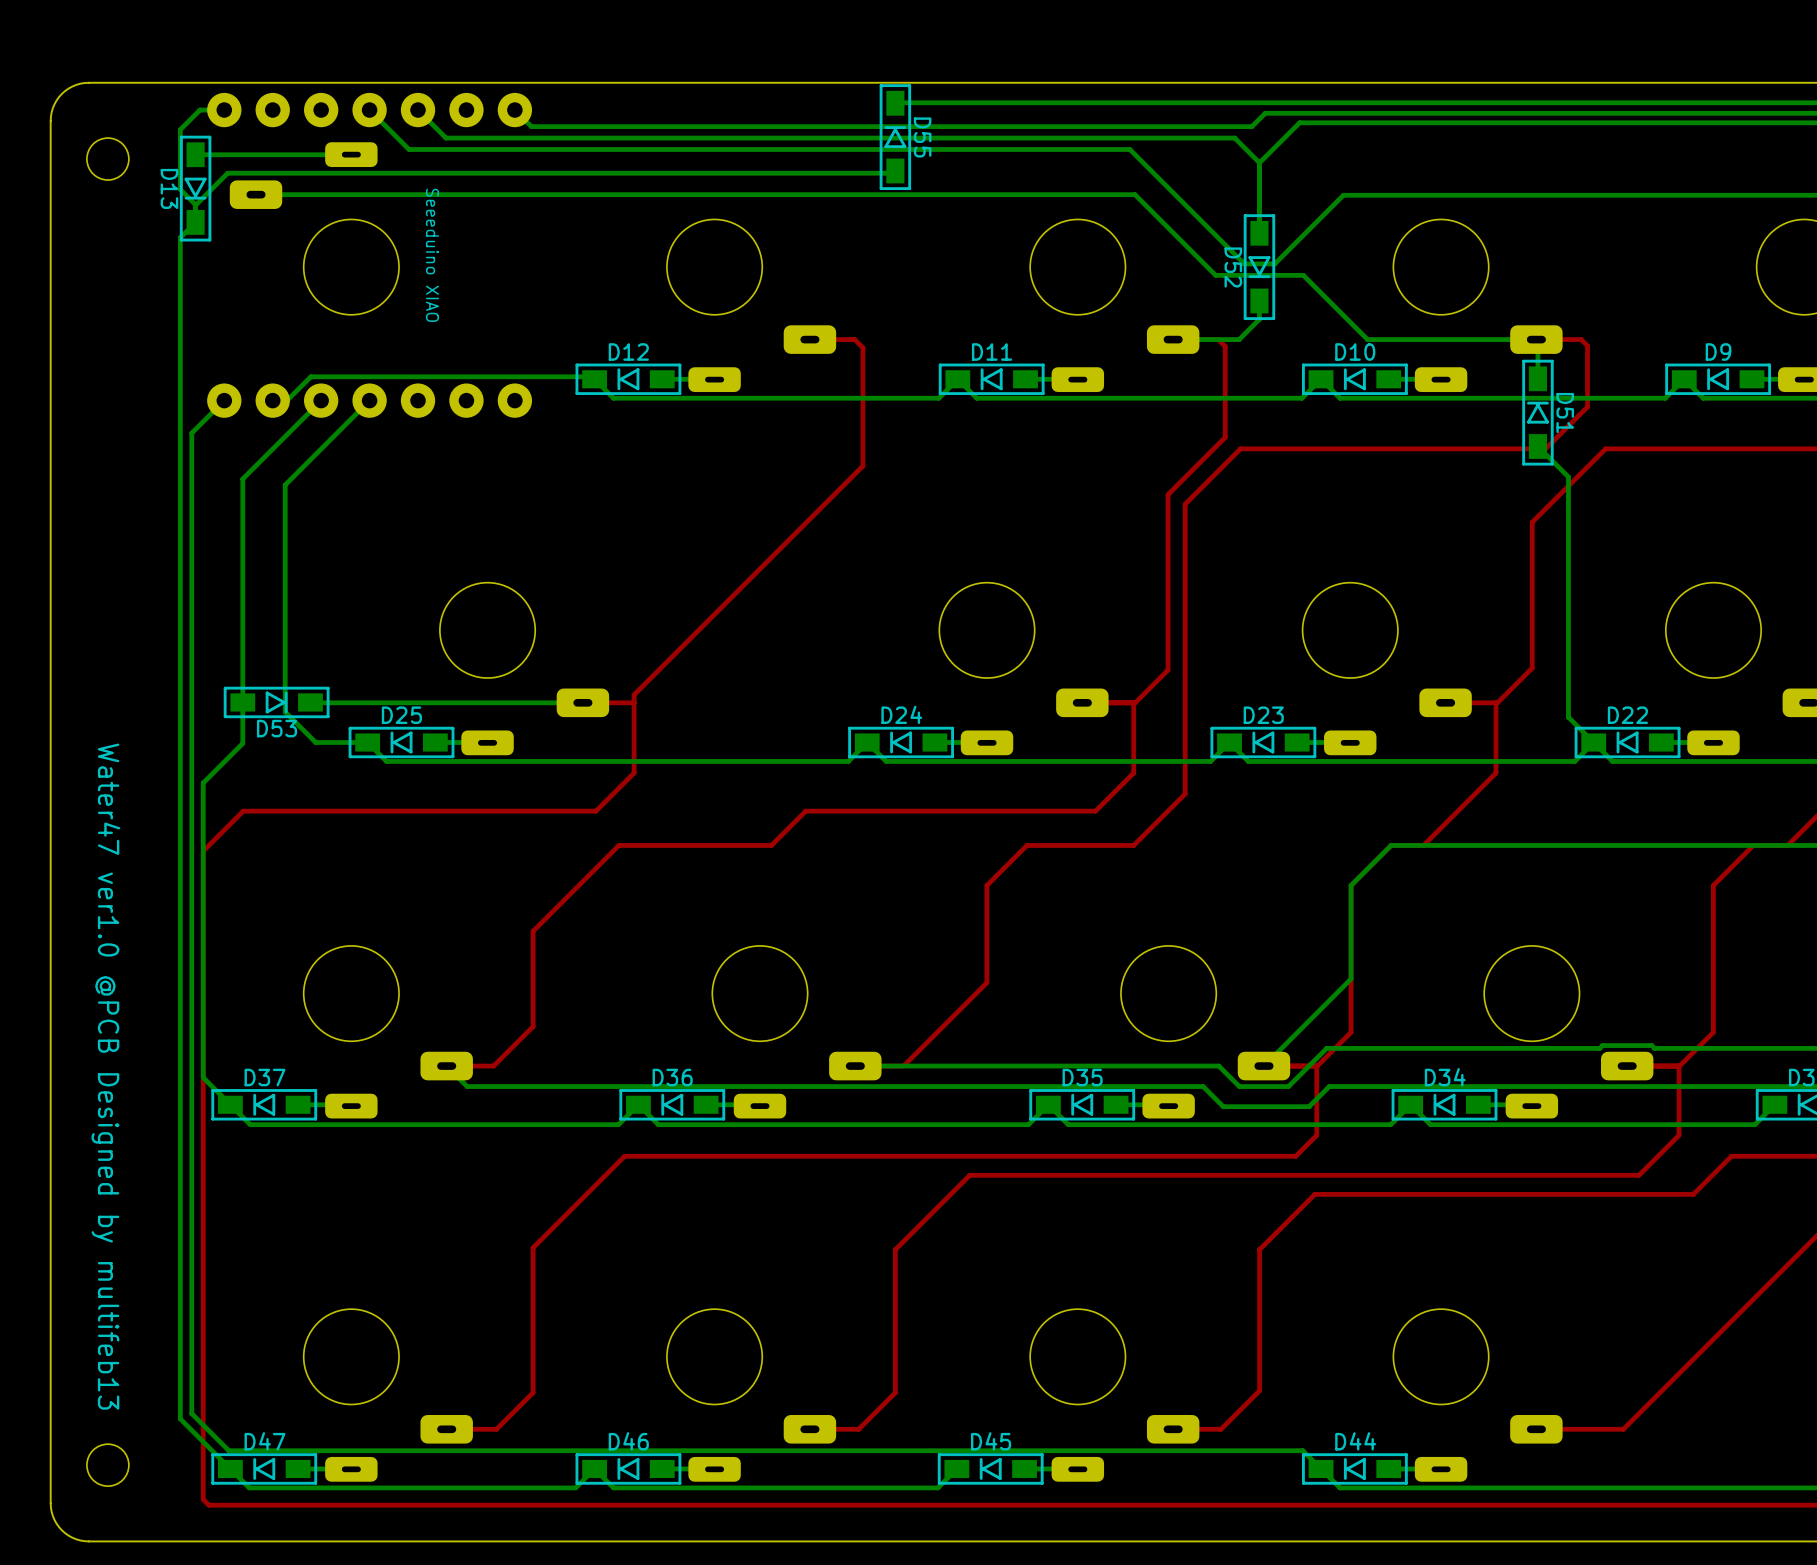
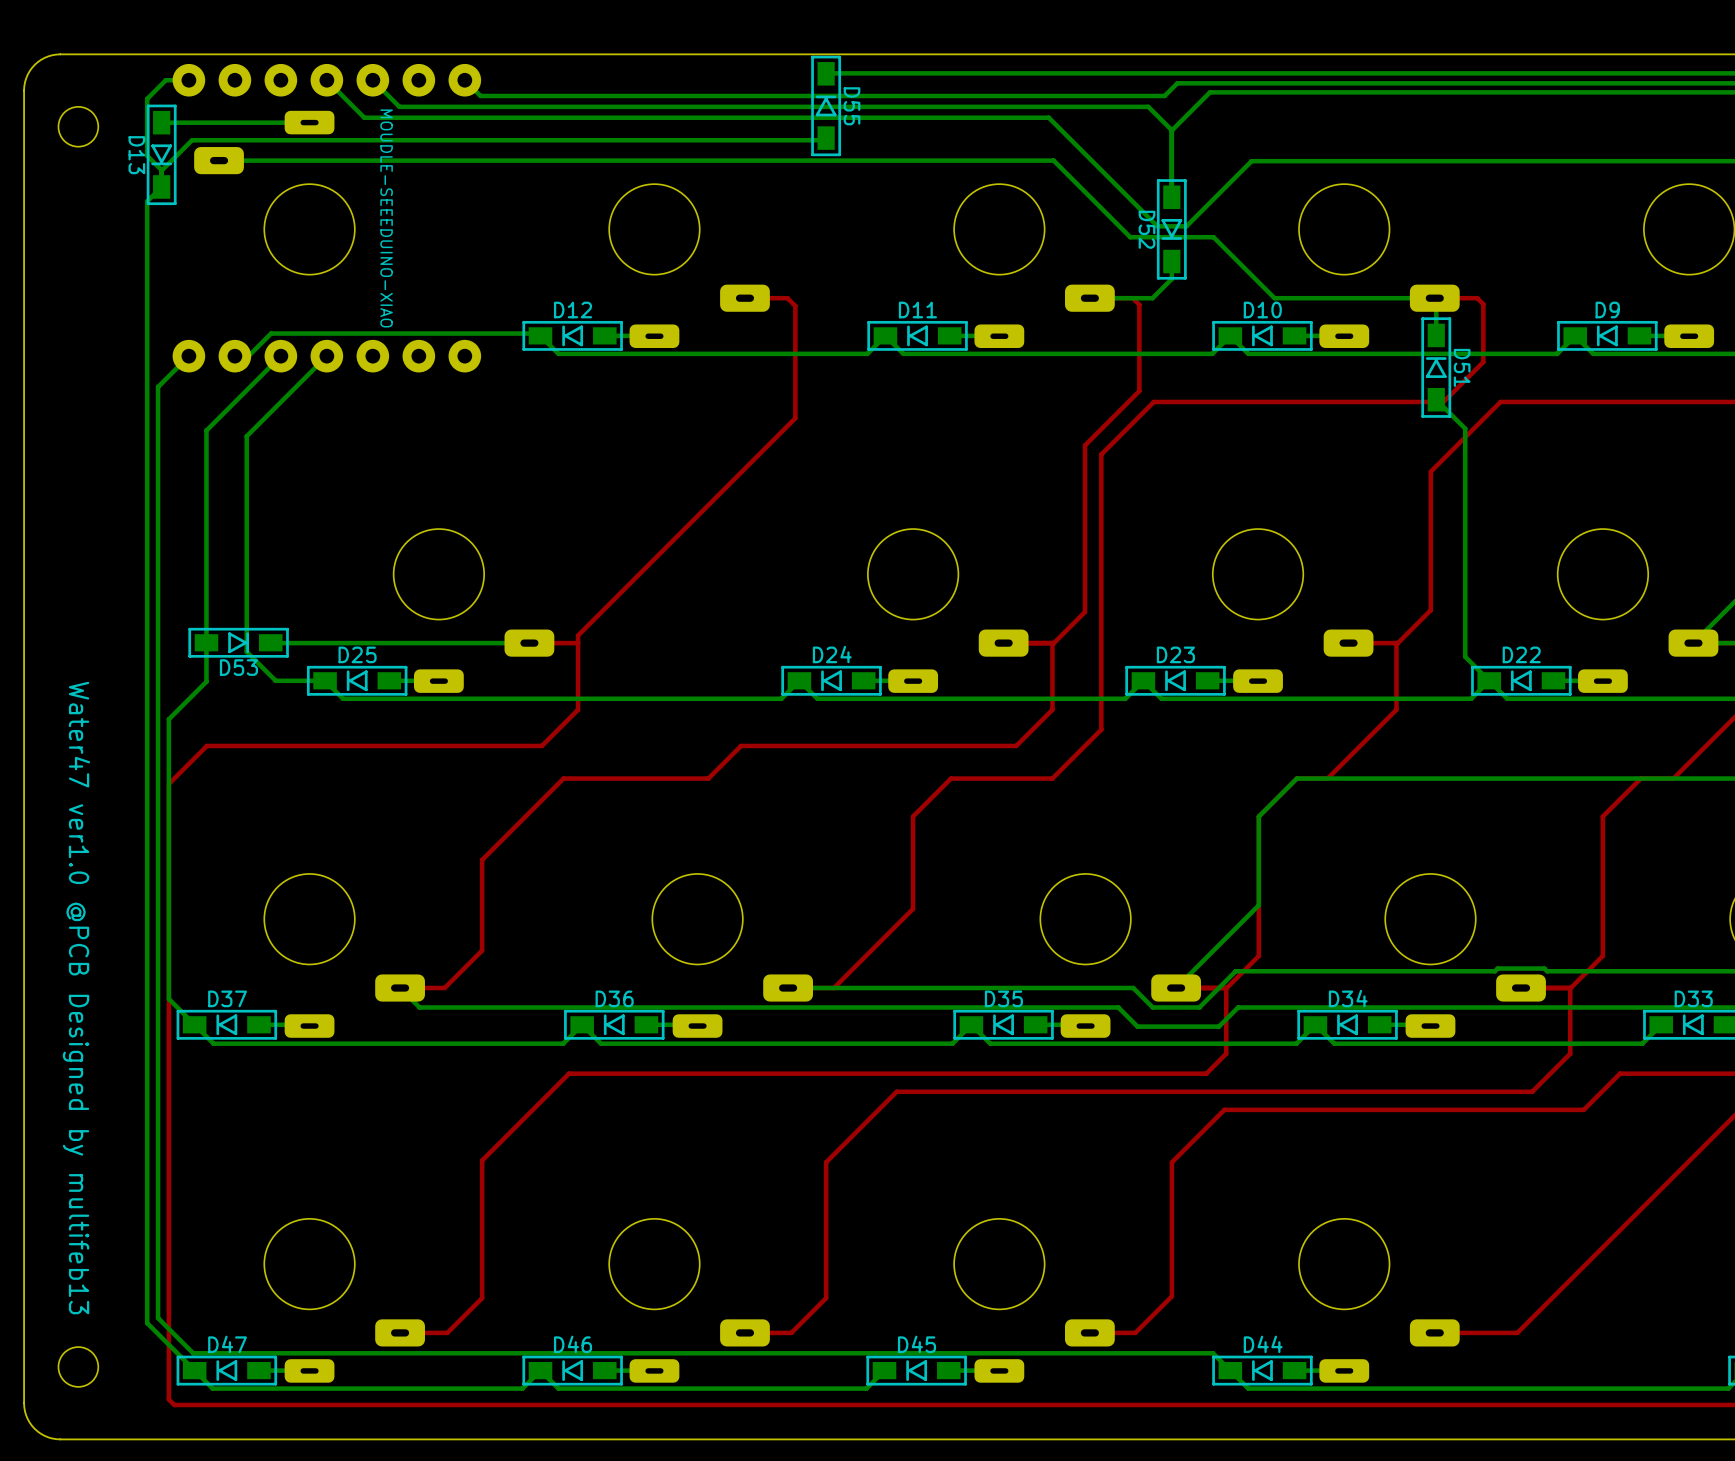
part value: Seeeduino XIAO (432, 255) -> MOUDLE-SEEEDUINO-XIAO (386, 218)

